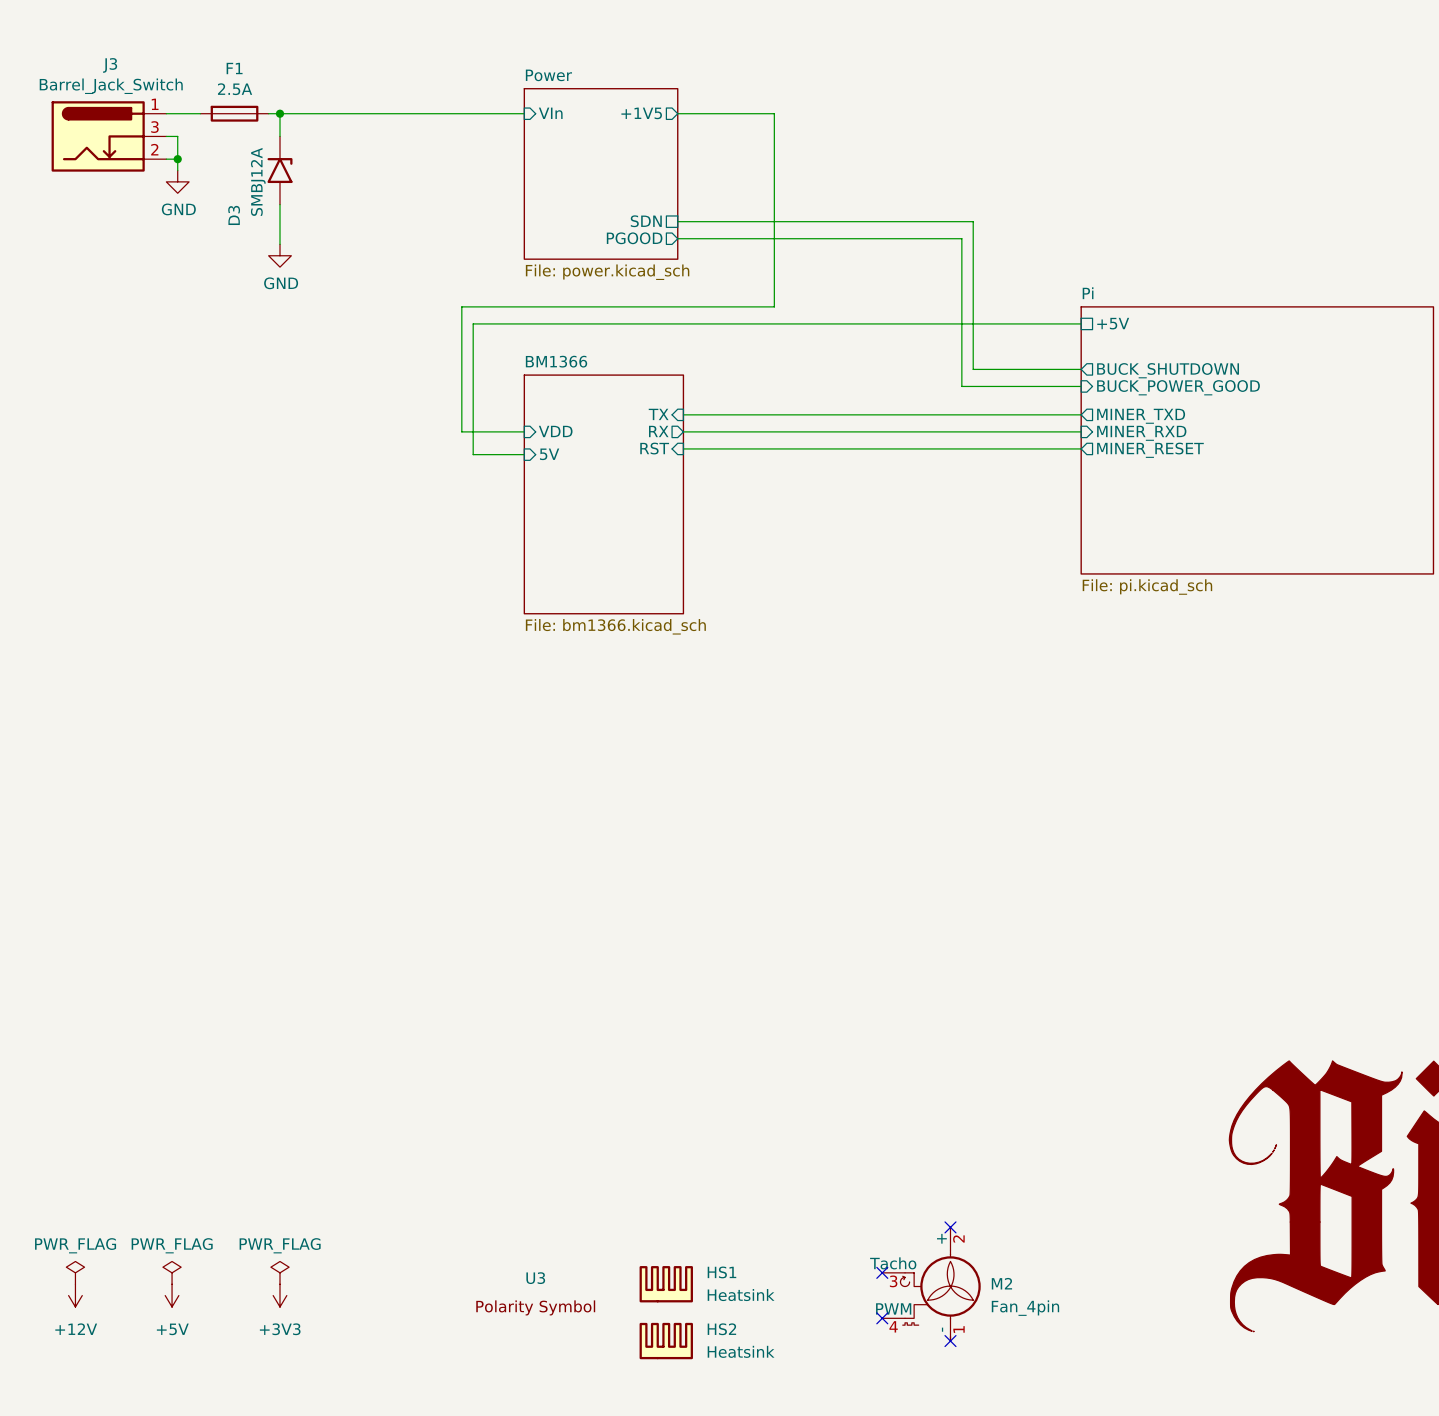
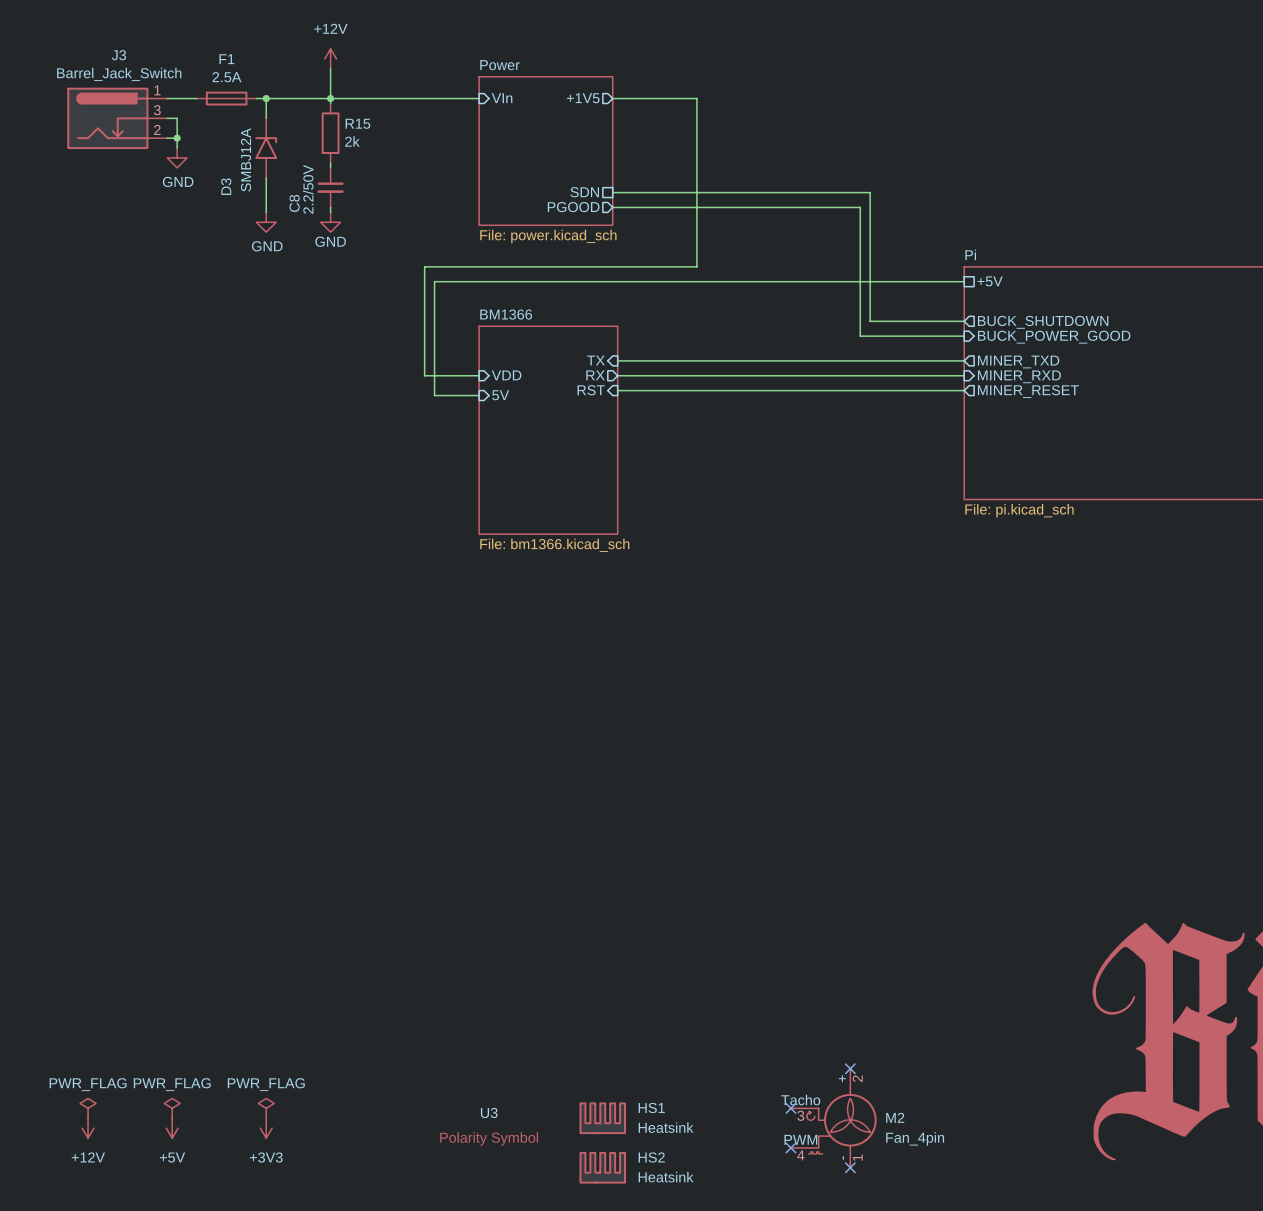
power symbol: none -> +12V (330, 58)
wire: none -> (330, 68) (330, 103)
junction: none -> (330, 98)
R15: none -> 2k (330, 133)
wire: none -> (330, 162) (330, 167)
C8: none -> 2.2/50V (330, 187)
wire: none -> (330, 207) (330, 212)
power symbol: none -> GND (330, 222)

